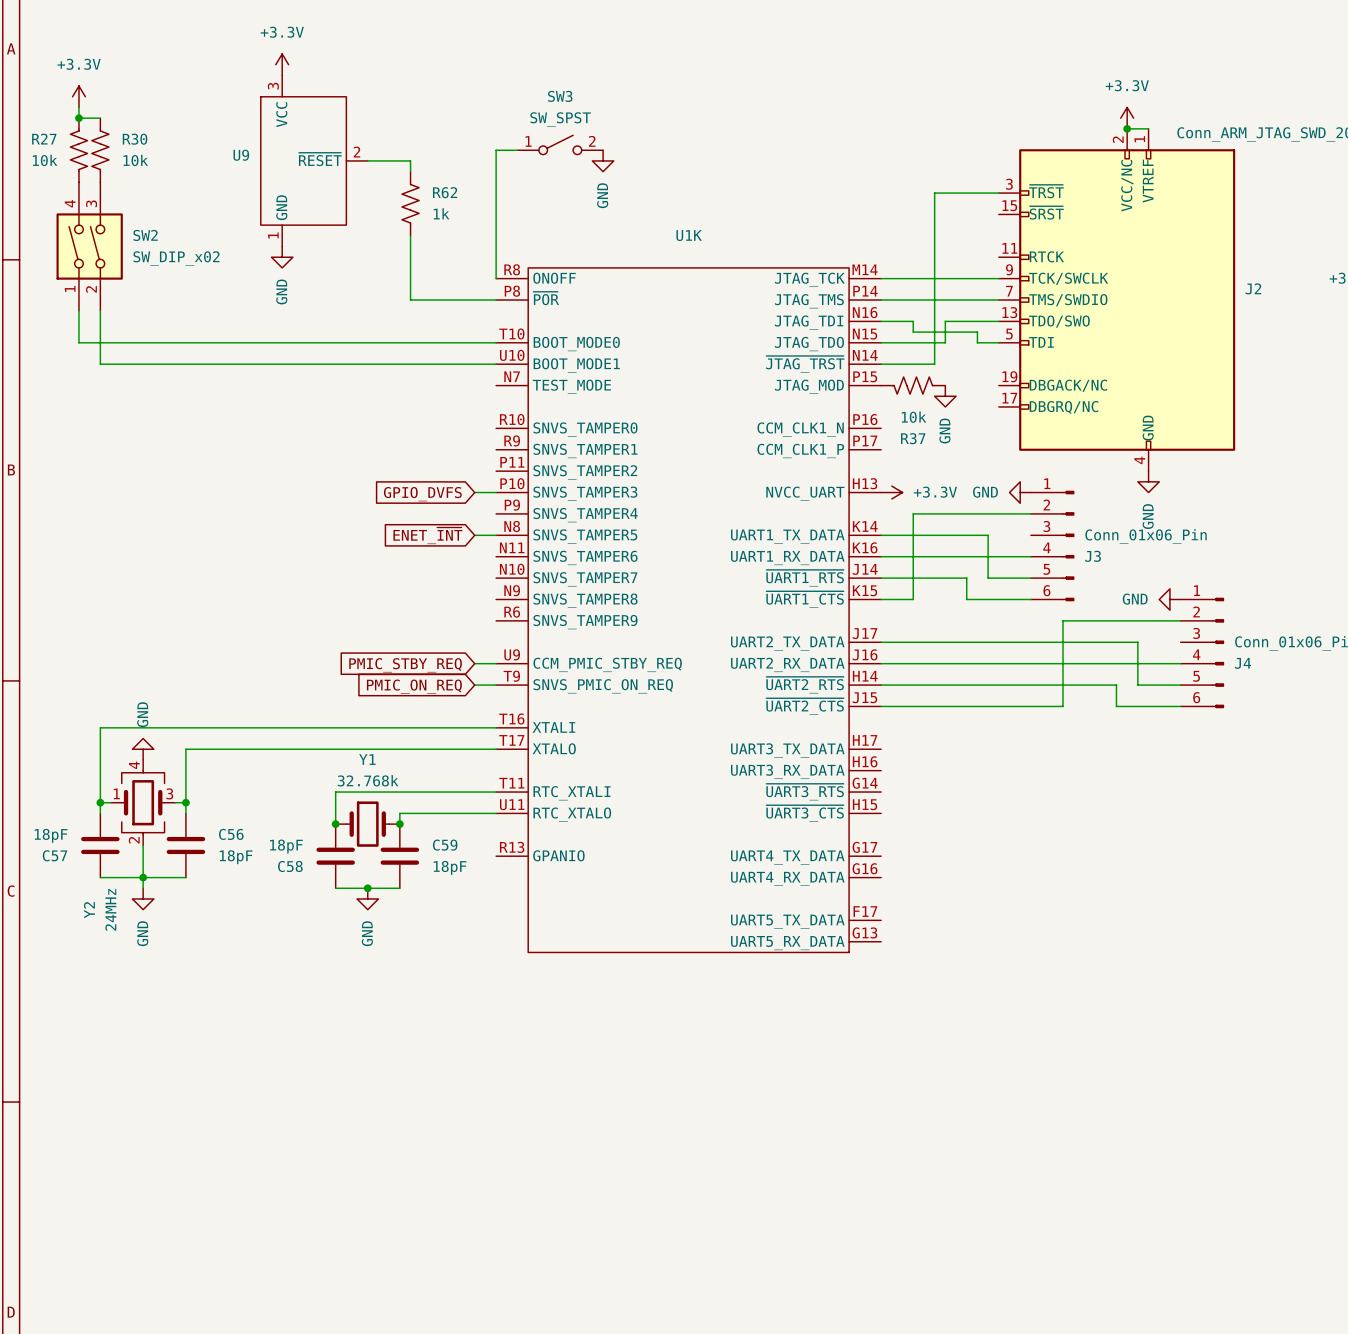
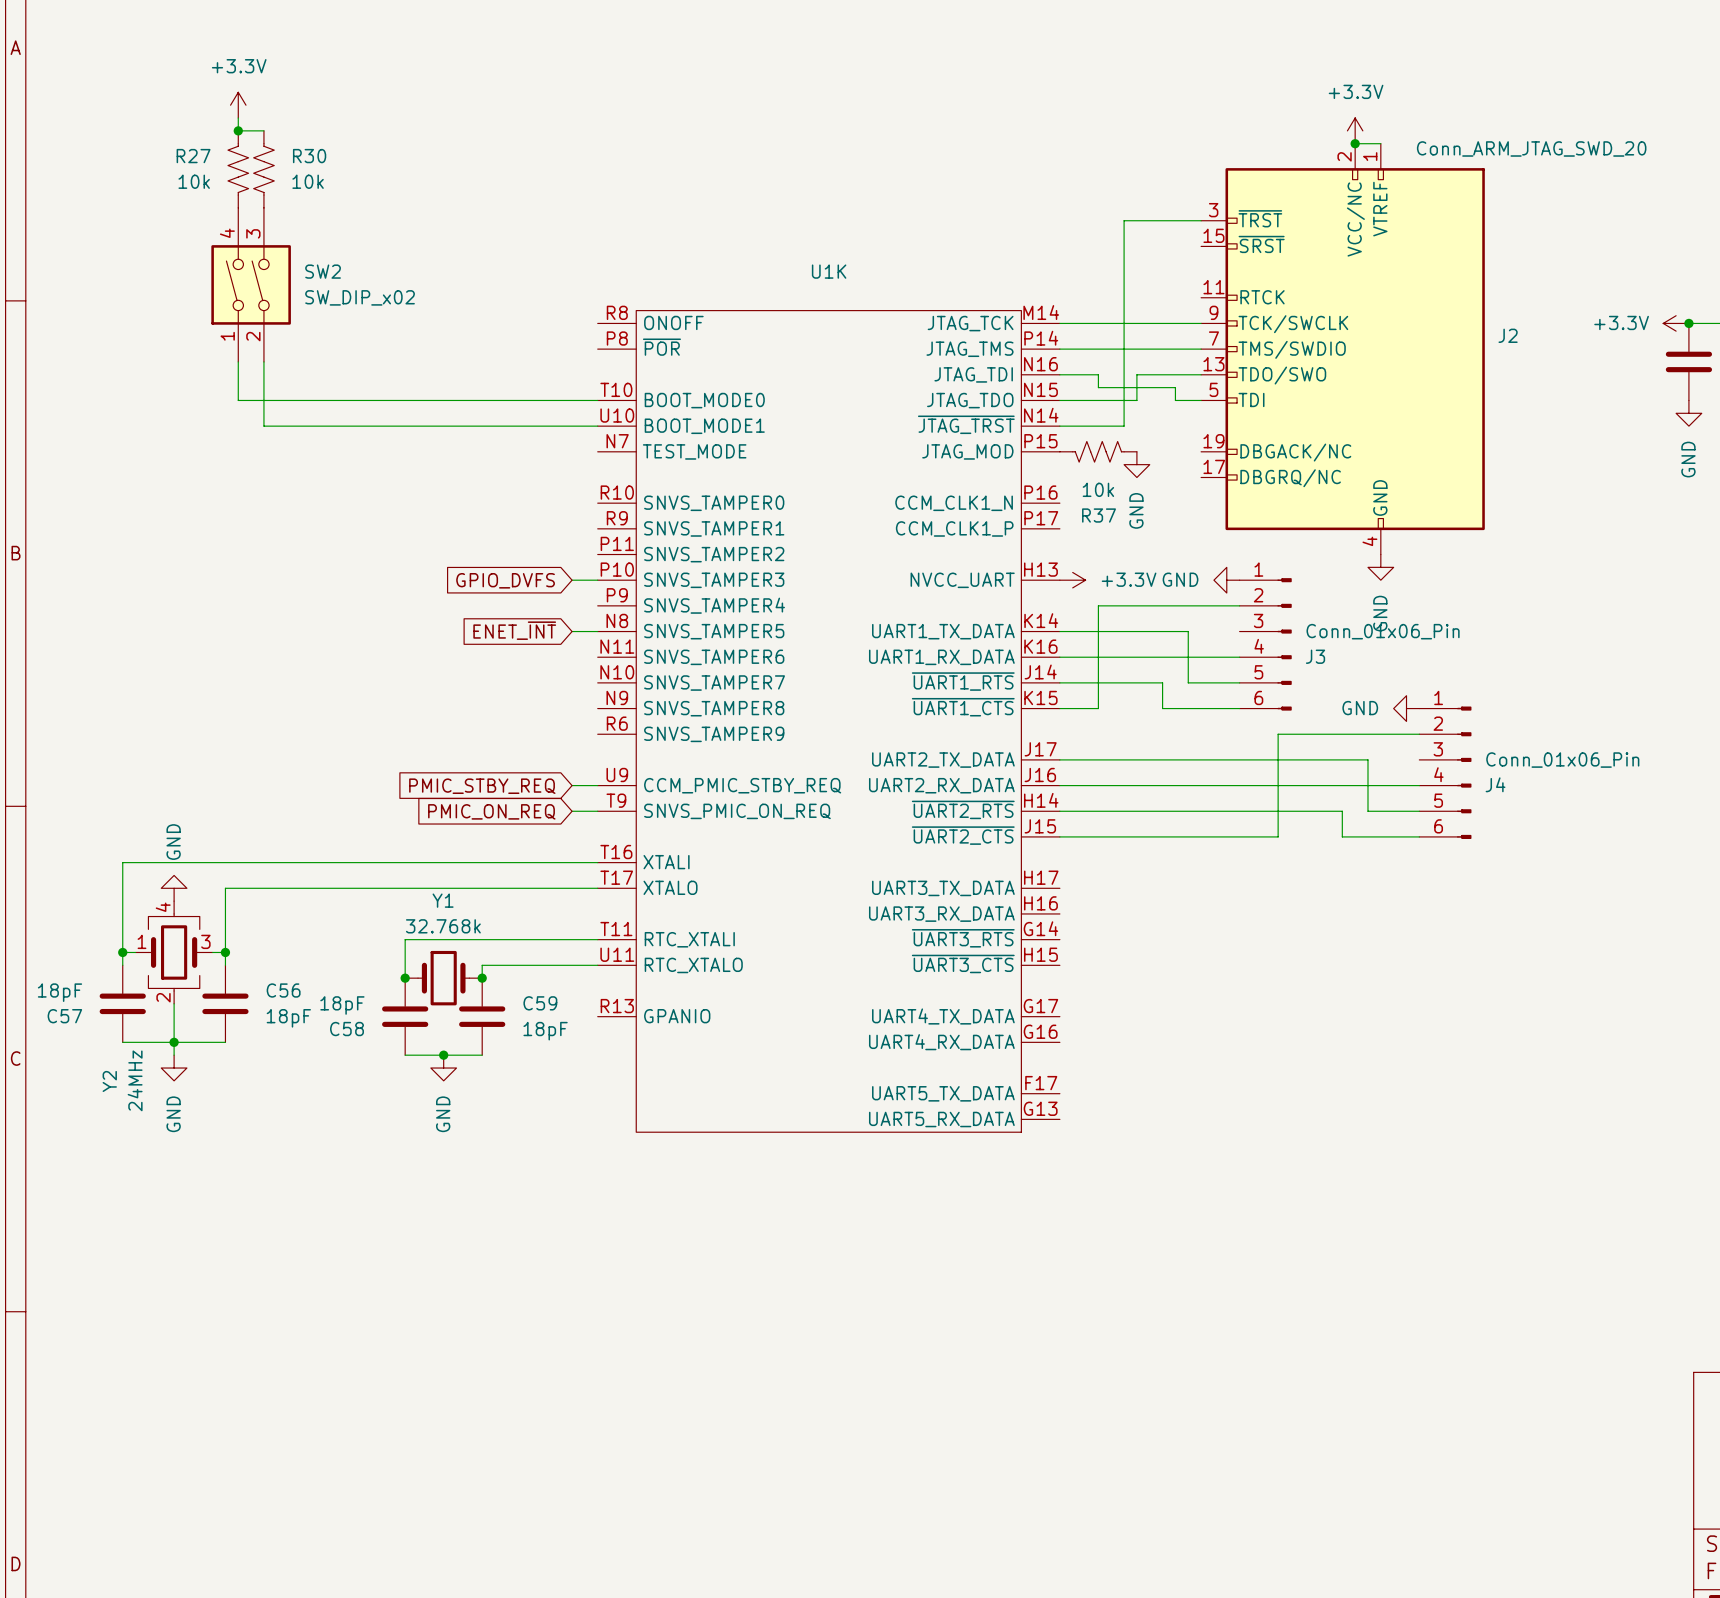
power symbol: +3.3V (282, 64) -> none
power symbol: +3.3V (78, 96) -> none
power symbol: none -> +3.3V (238, 105)
wire: (78, 107) (78, 118) (100, 118) -> (238, 118) (238, 130) (263, 130)
junction: (78, 118) -> none
junction: none -> (238, 130)
SW3: SW_SPST (560, 144) -> none
R27 position: (78, 150) -> (238, 169)
R30 position: (100, 150) -> (263, 169)
wire: (517, 150) (496, 150) (496, 278) -> none
U9: (314, 160) -> none
wire: (367, 160) (410, 160) (410, 171) -> none
power symbol: GND (603, 160) -> none
R62: 1k (410, 203) -> none
wire: (410, 235) (410, 300) (496, 300) -> none
SW2 position: (89, 246) -> (251, 284)
power symbol: GND (282, 257) -> none
wire: (78, 310) (78, 342) (196, 342) -> (238, 361) (238, 400)
wire: (100, 310) (100, 364) (218, 364) -> (263, 361) (263, 426)

